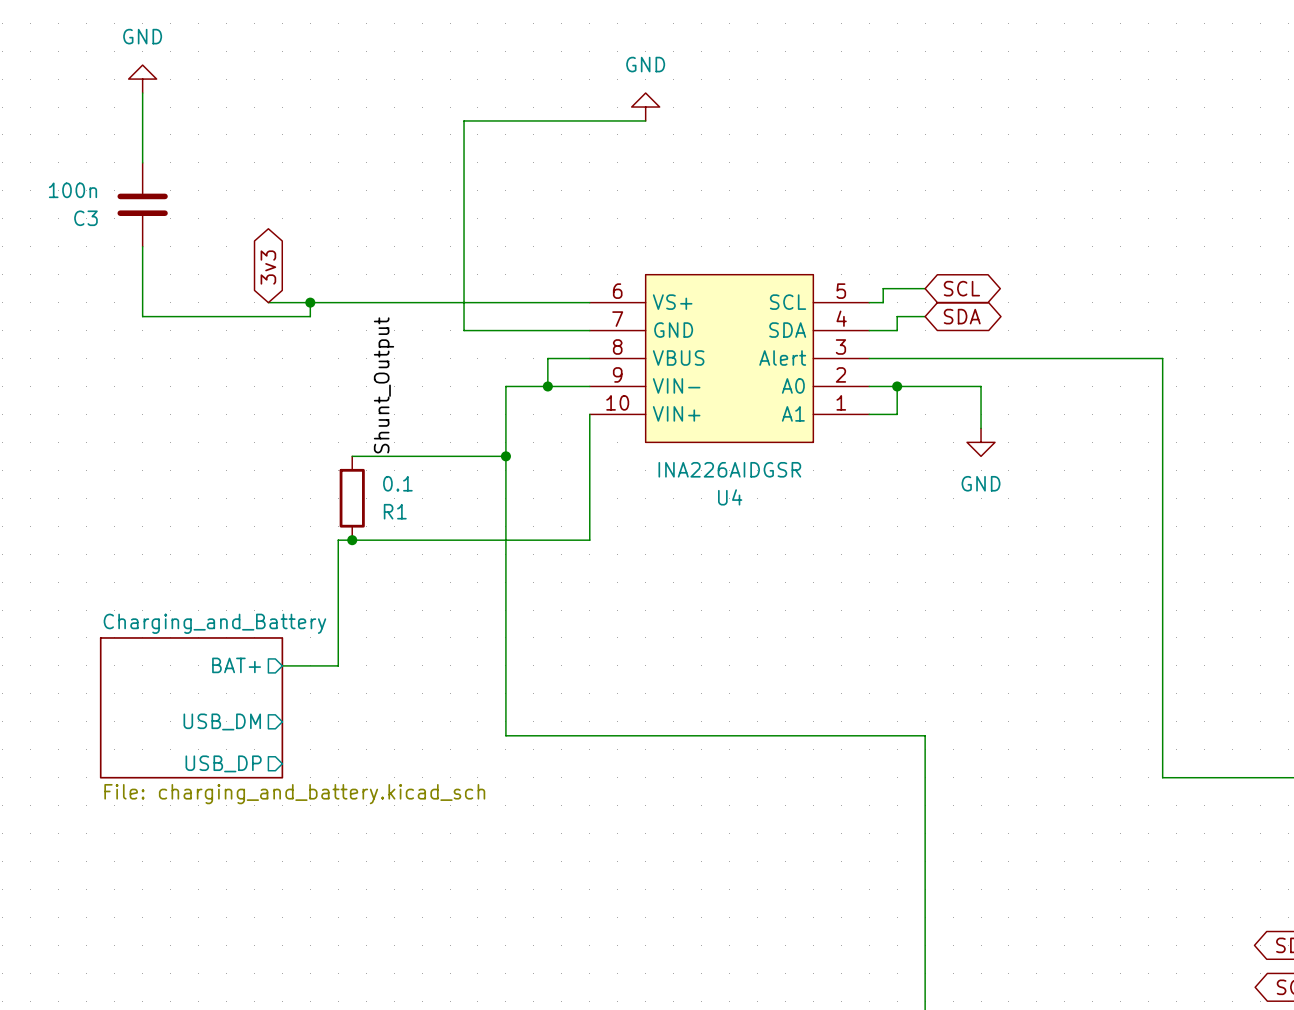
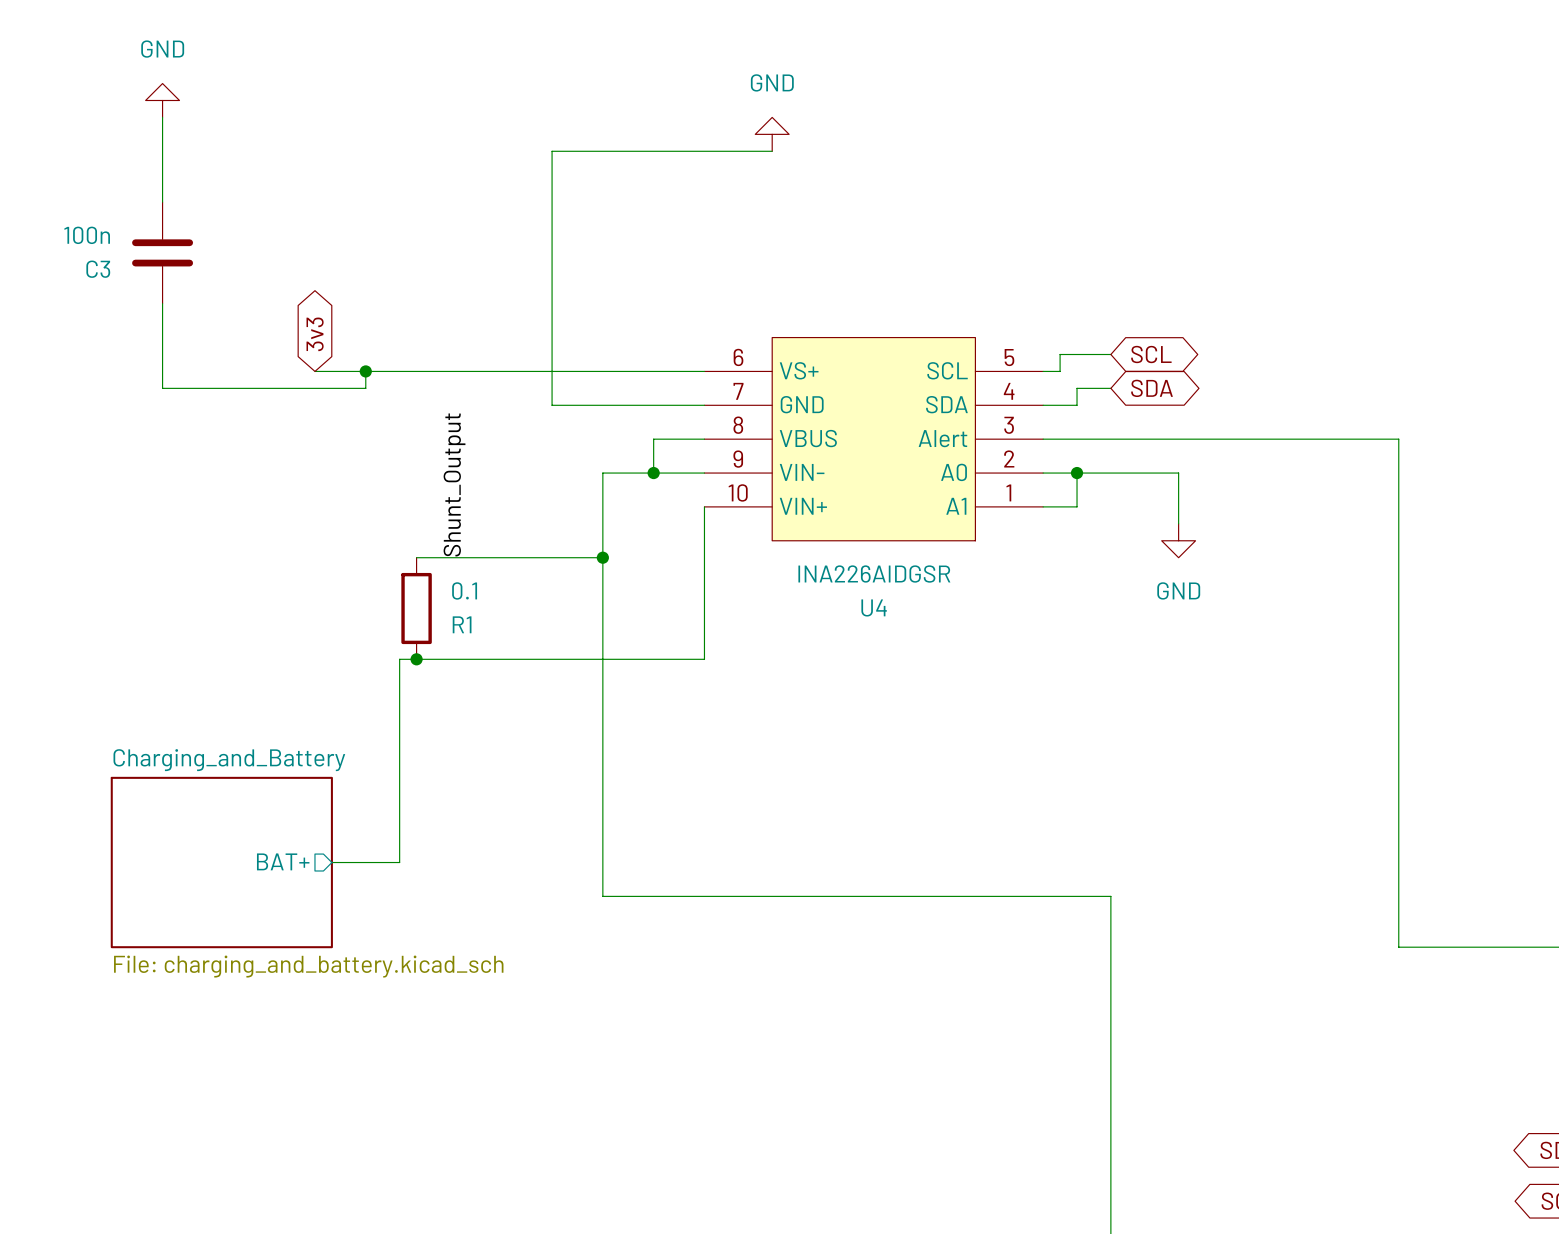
sheet pin position: BAT+ (236, 665) -> BAT+ (283, 861)
wire: (282, 665) (338, 665) -> (331, 862) (399, 862) (399, 811)
sheet pin: USB_DM (222, 721) -> none
sheet pin: USB_DP (223, 763) -> none

